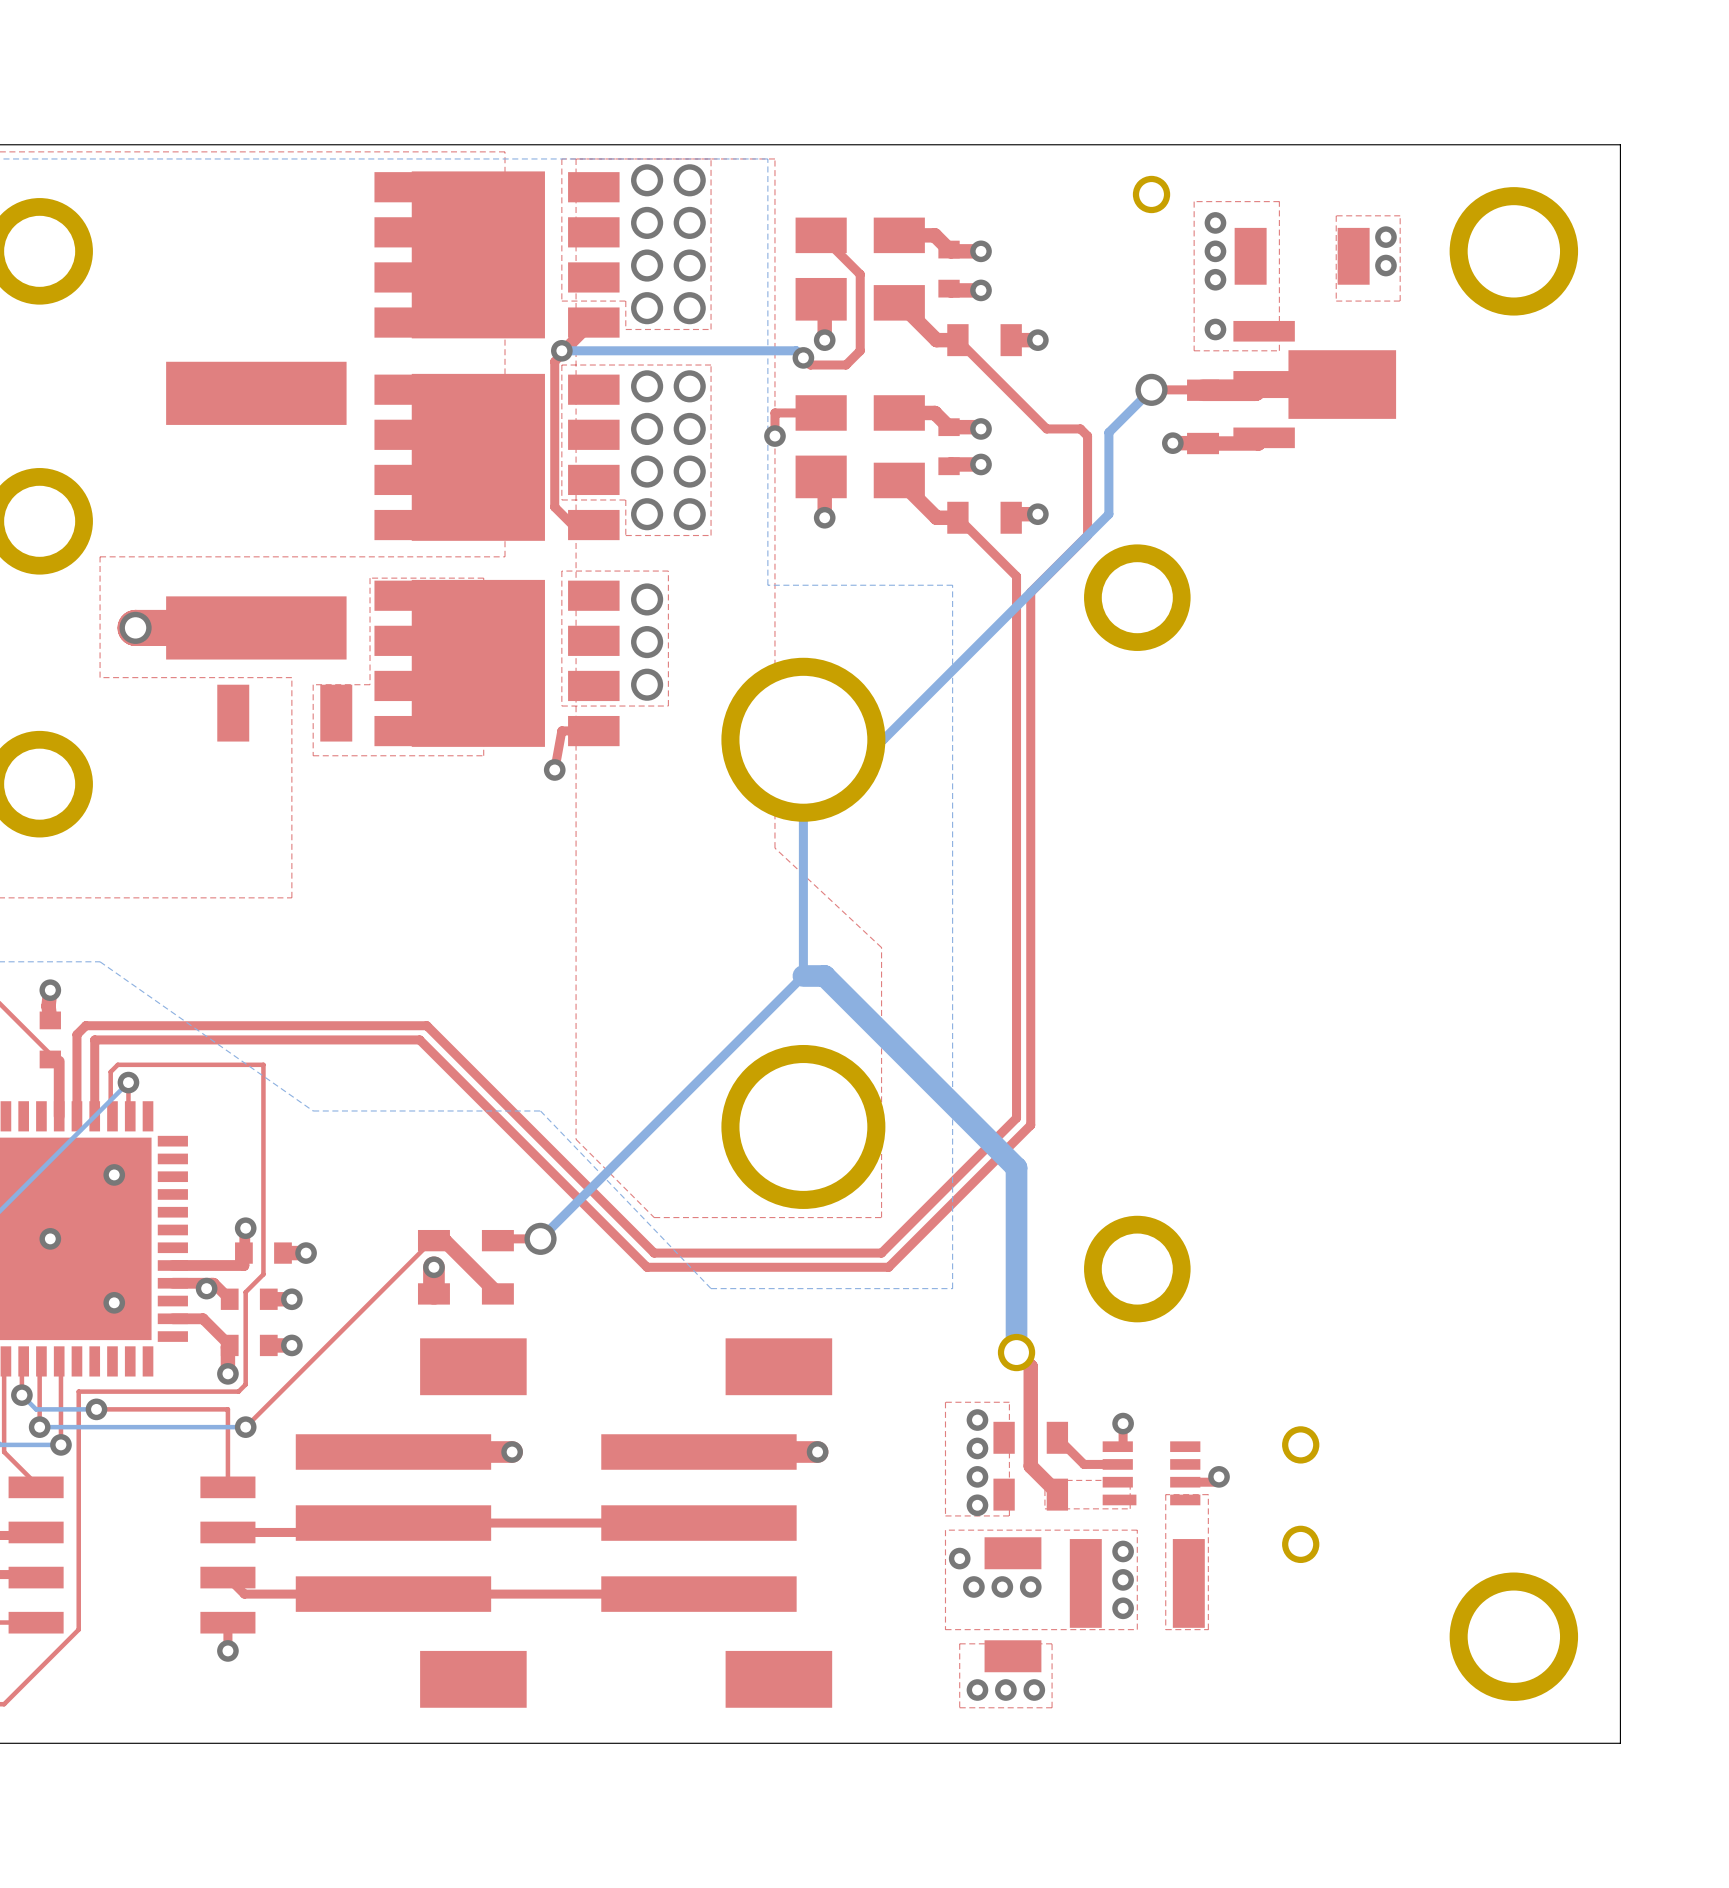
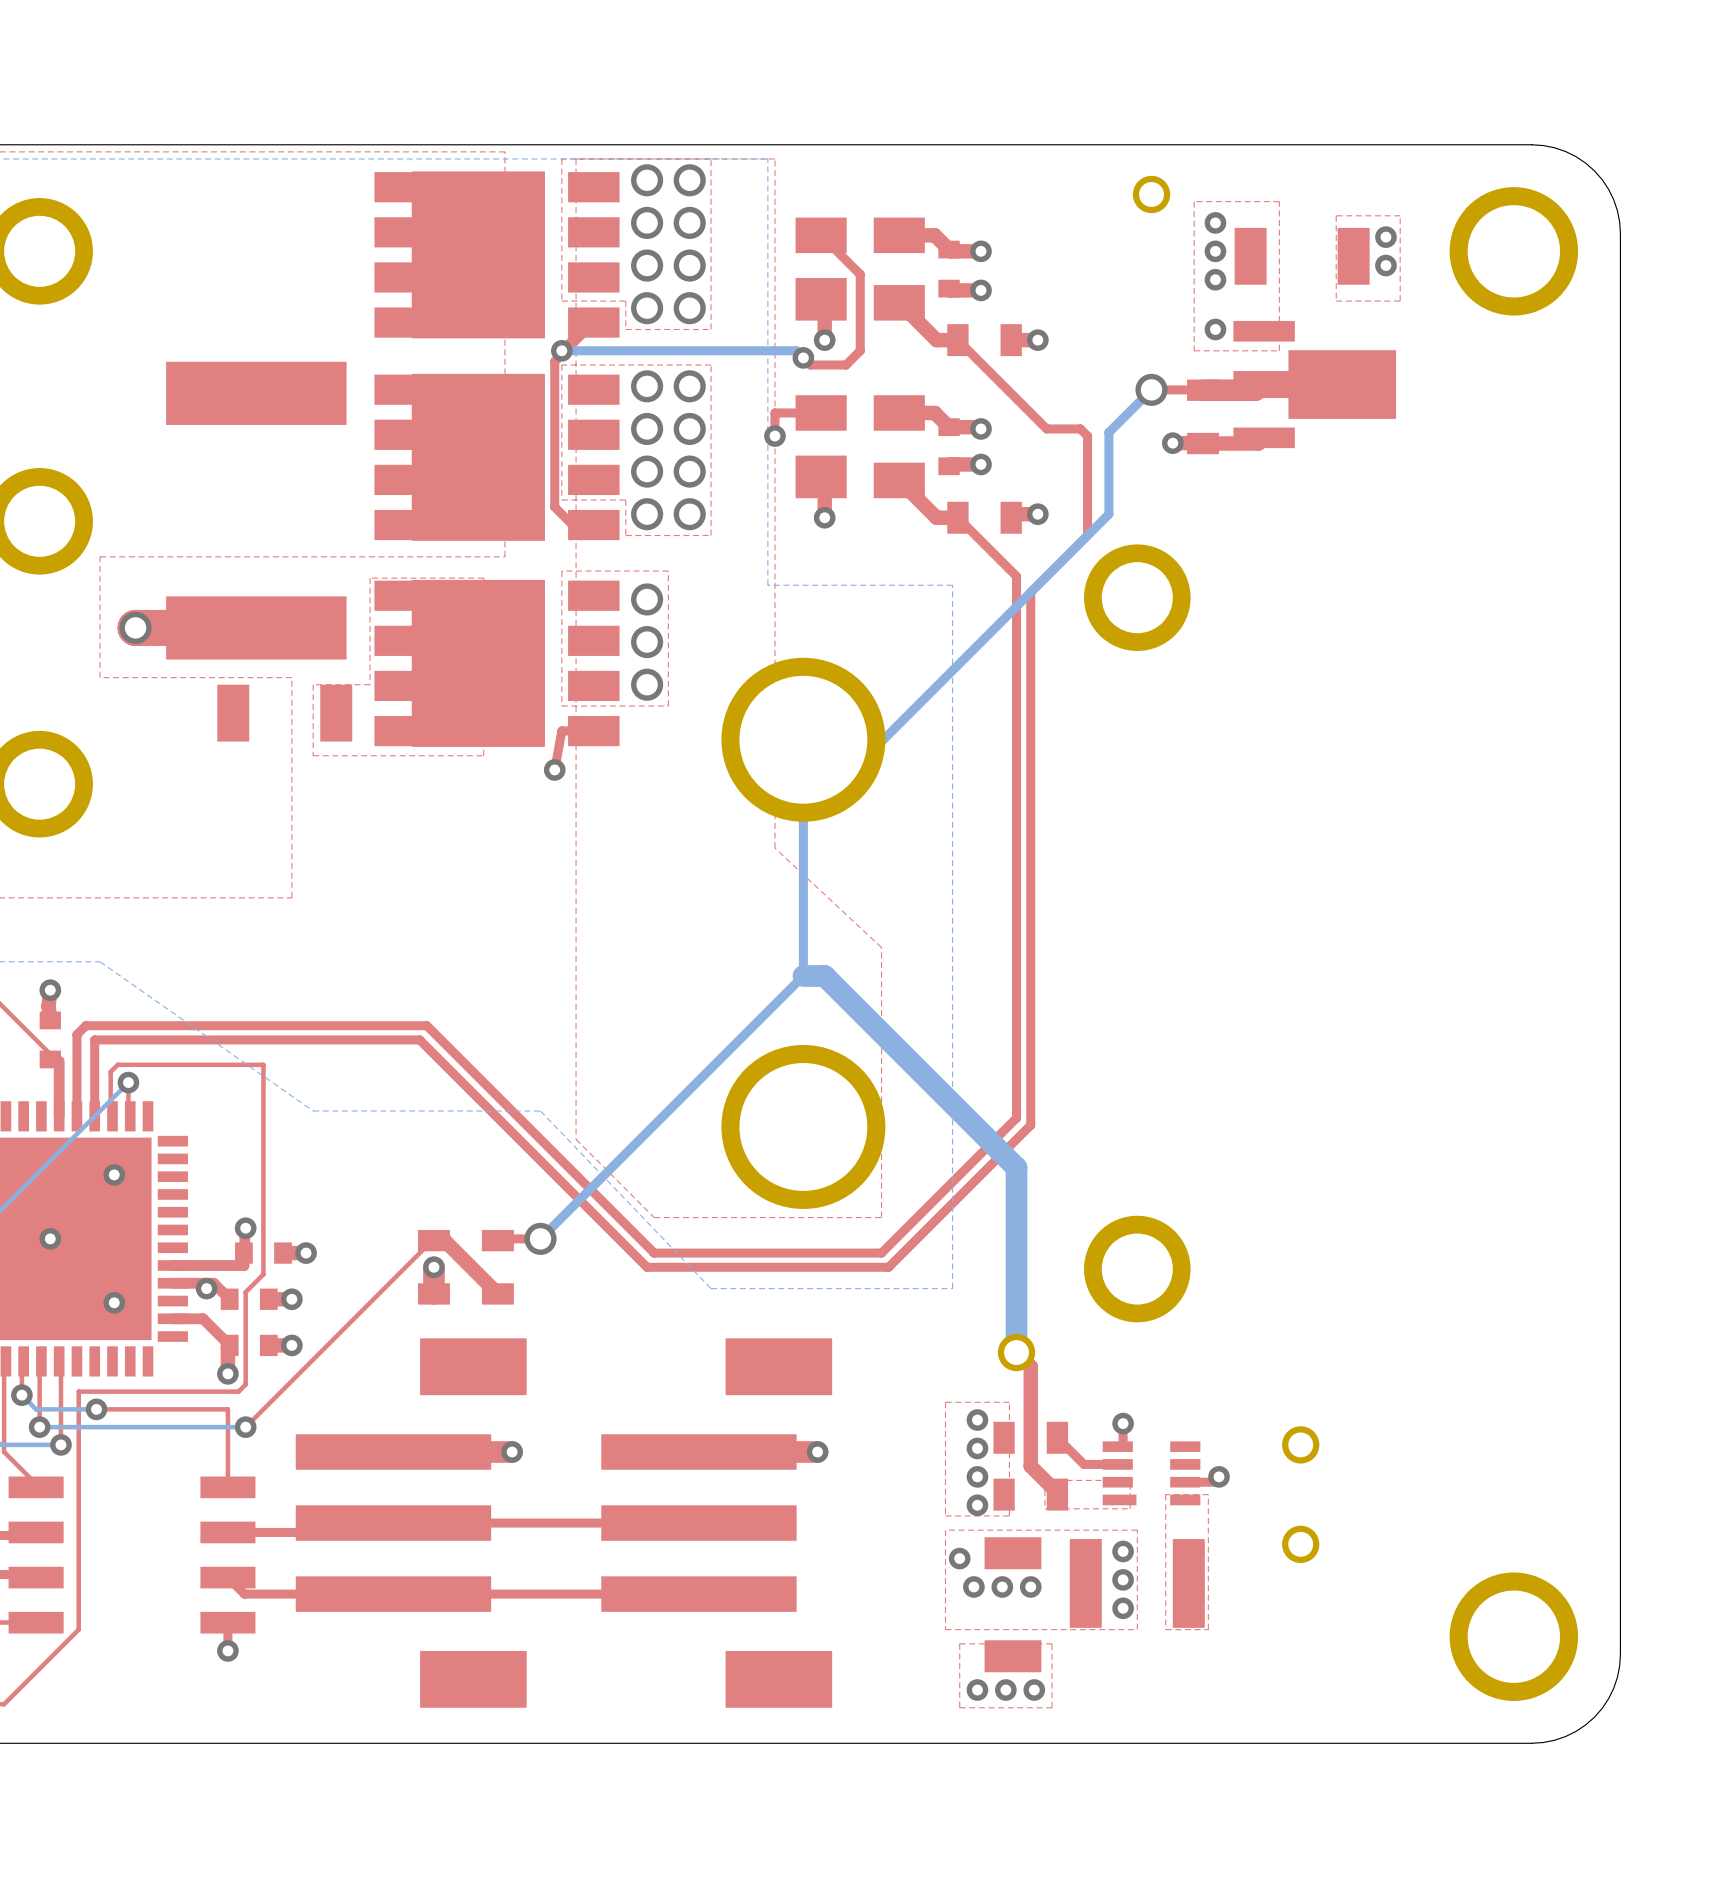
board edge: (1531, 144) (1620, 144) (1620, 233) -> (1531, 144) (1543, 145) (1565, 151) (1576, 156) (1594, 170) (1608, 189) (1613, 199) (1619, 221) (1620, 233)
board edge: (1620, 1654) (1620, 1743) (1531, 1743) -> (1620, 1654) (1619, 1666) (1613, 1688) (1608, 1698) (1594, 1717) (1576, 1731) (1565, 1736) (1543, 1742) (1531, 1743)

